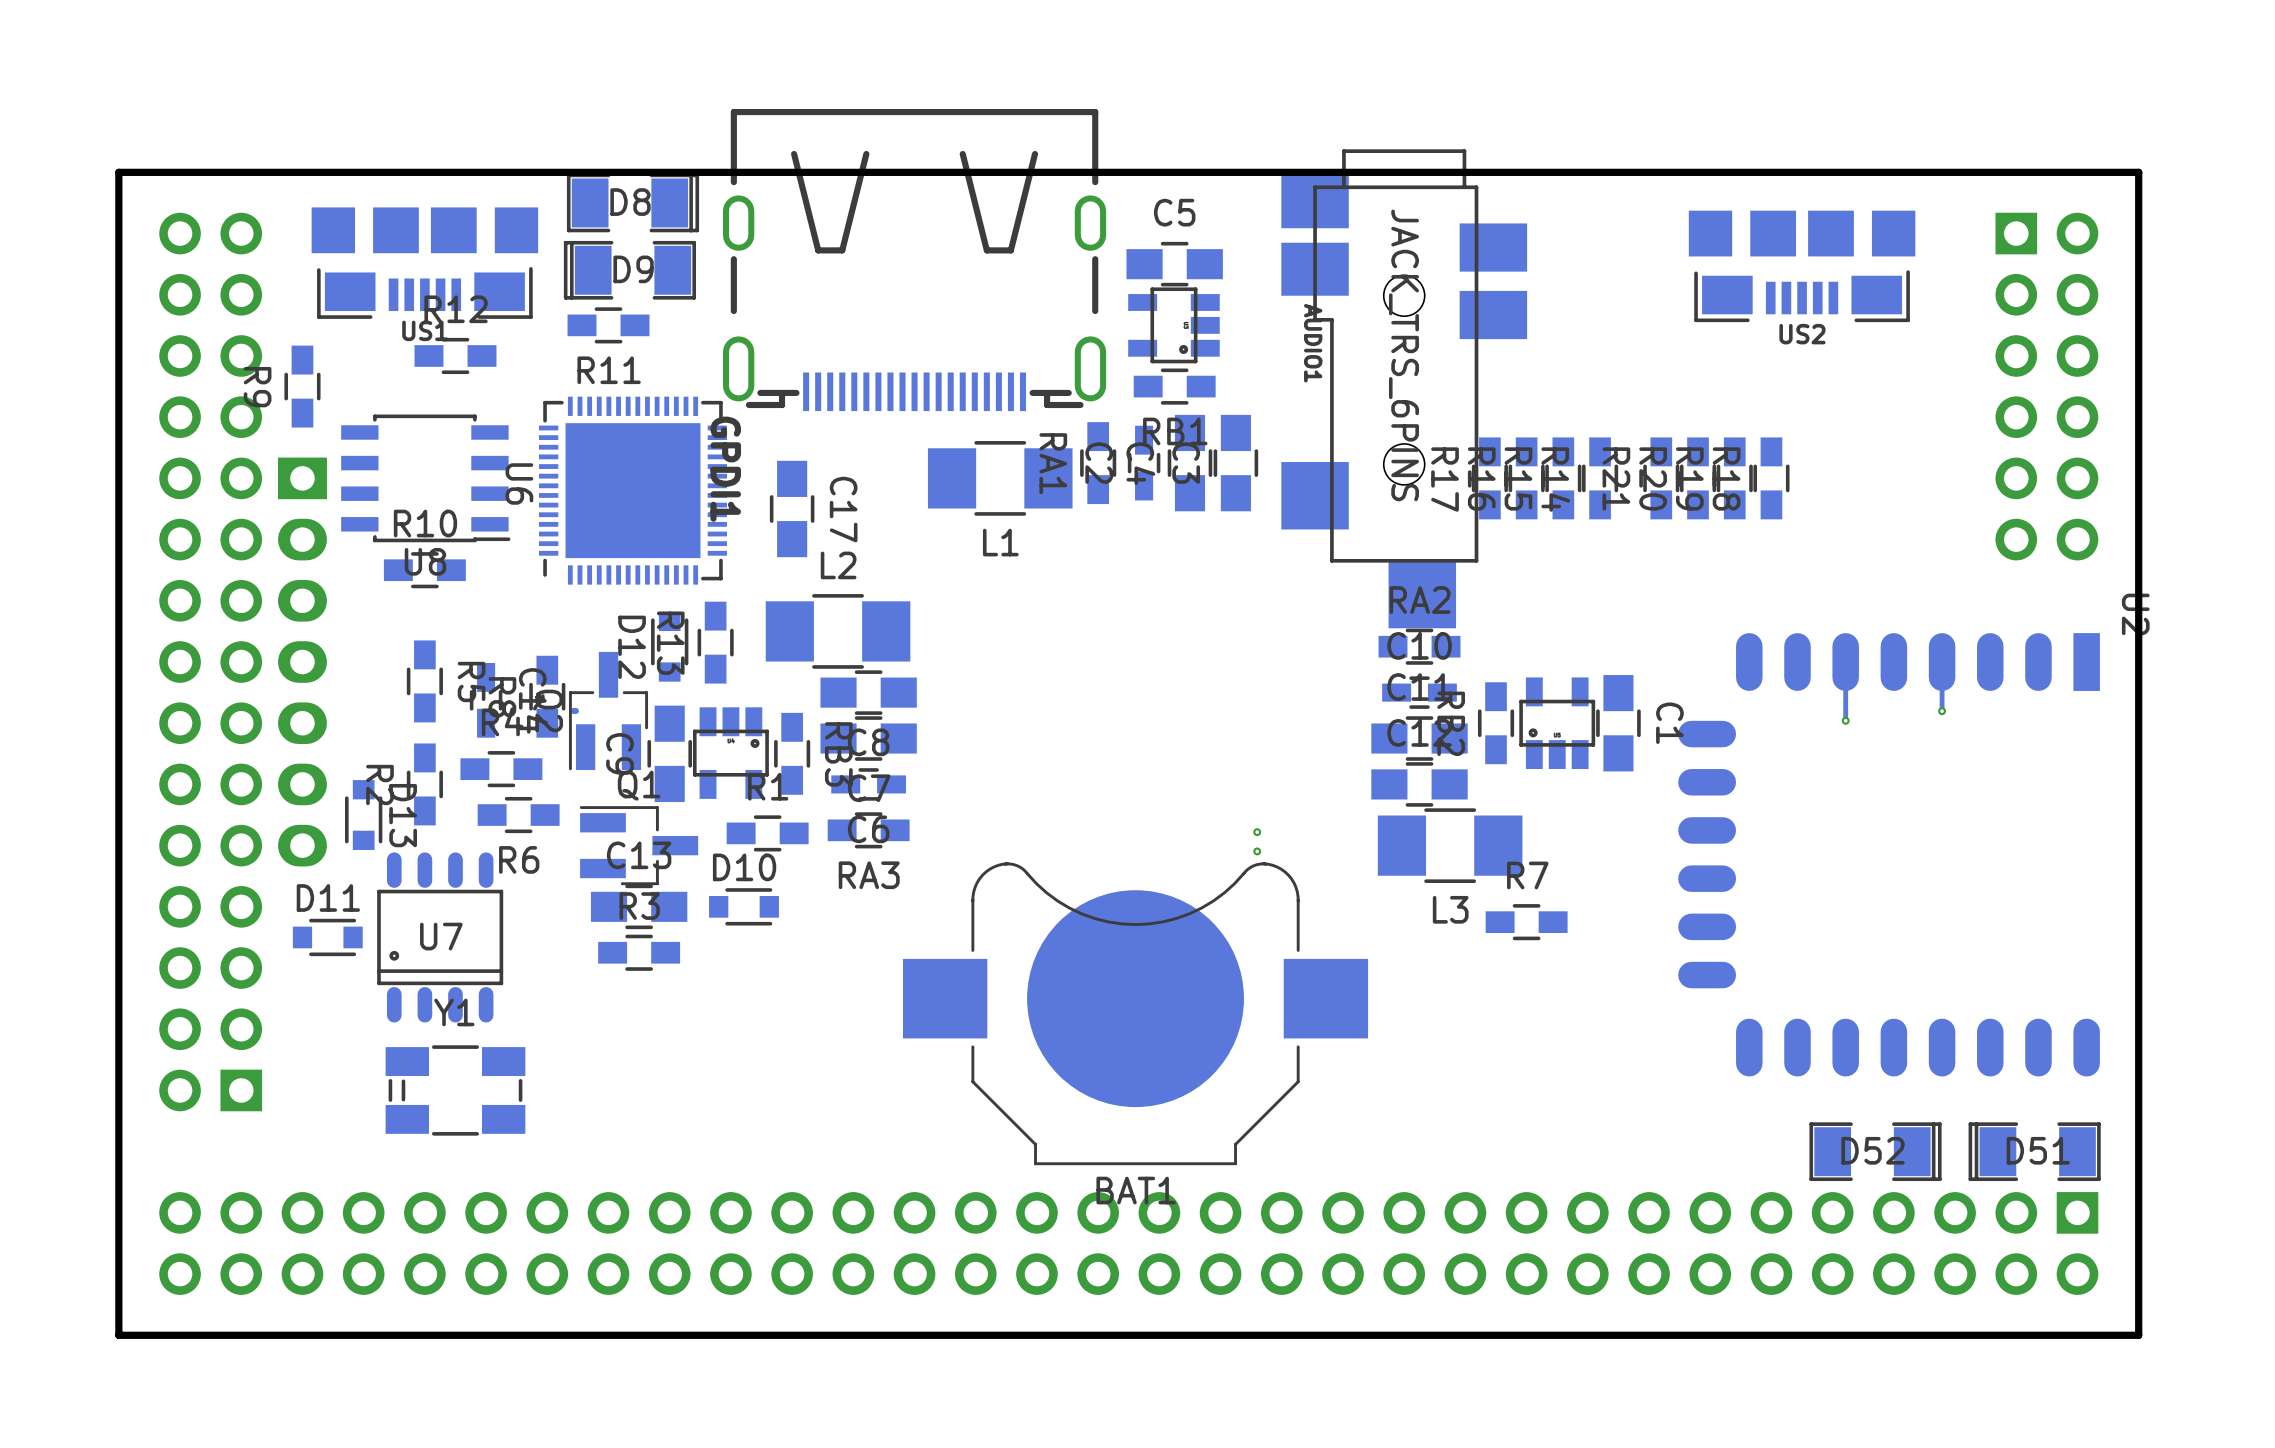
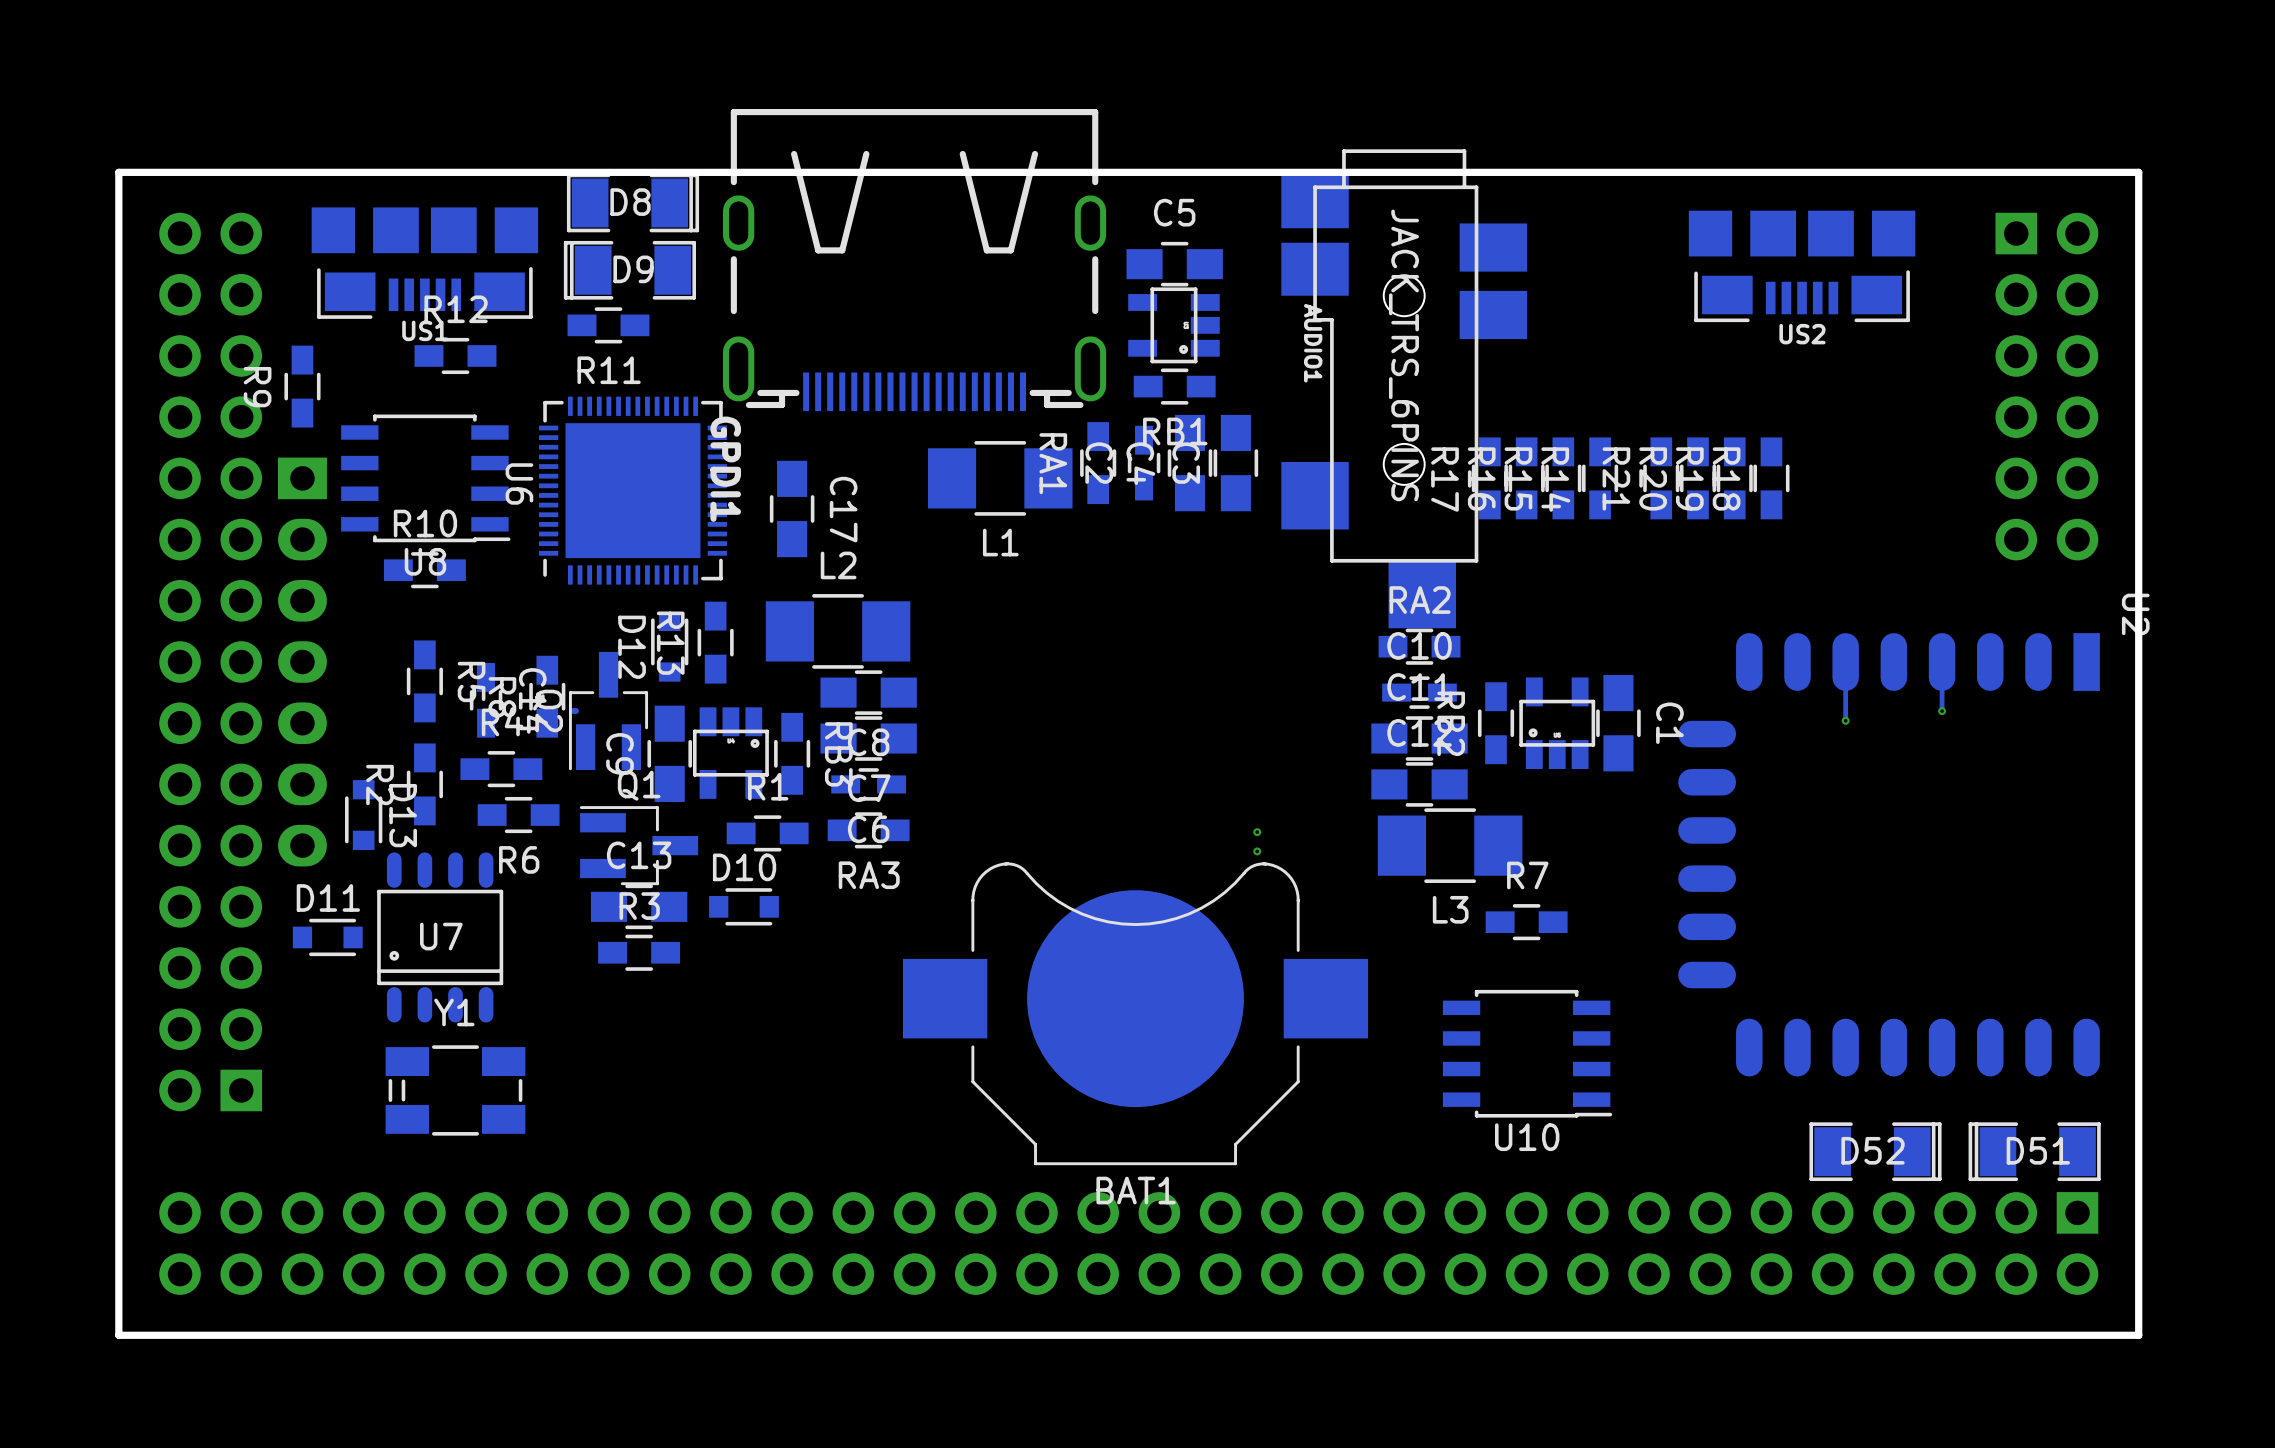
U10: none -> (1527, 1053)

